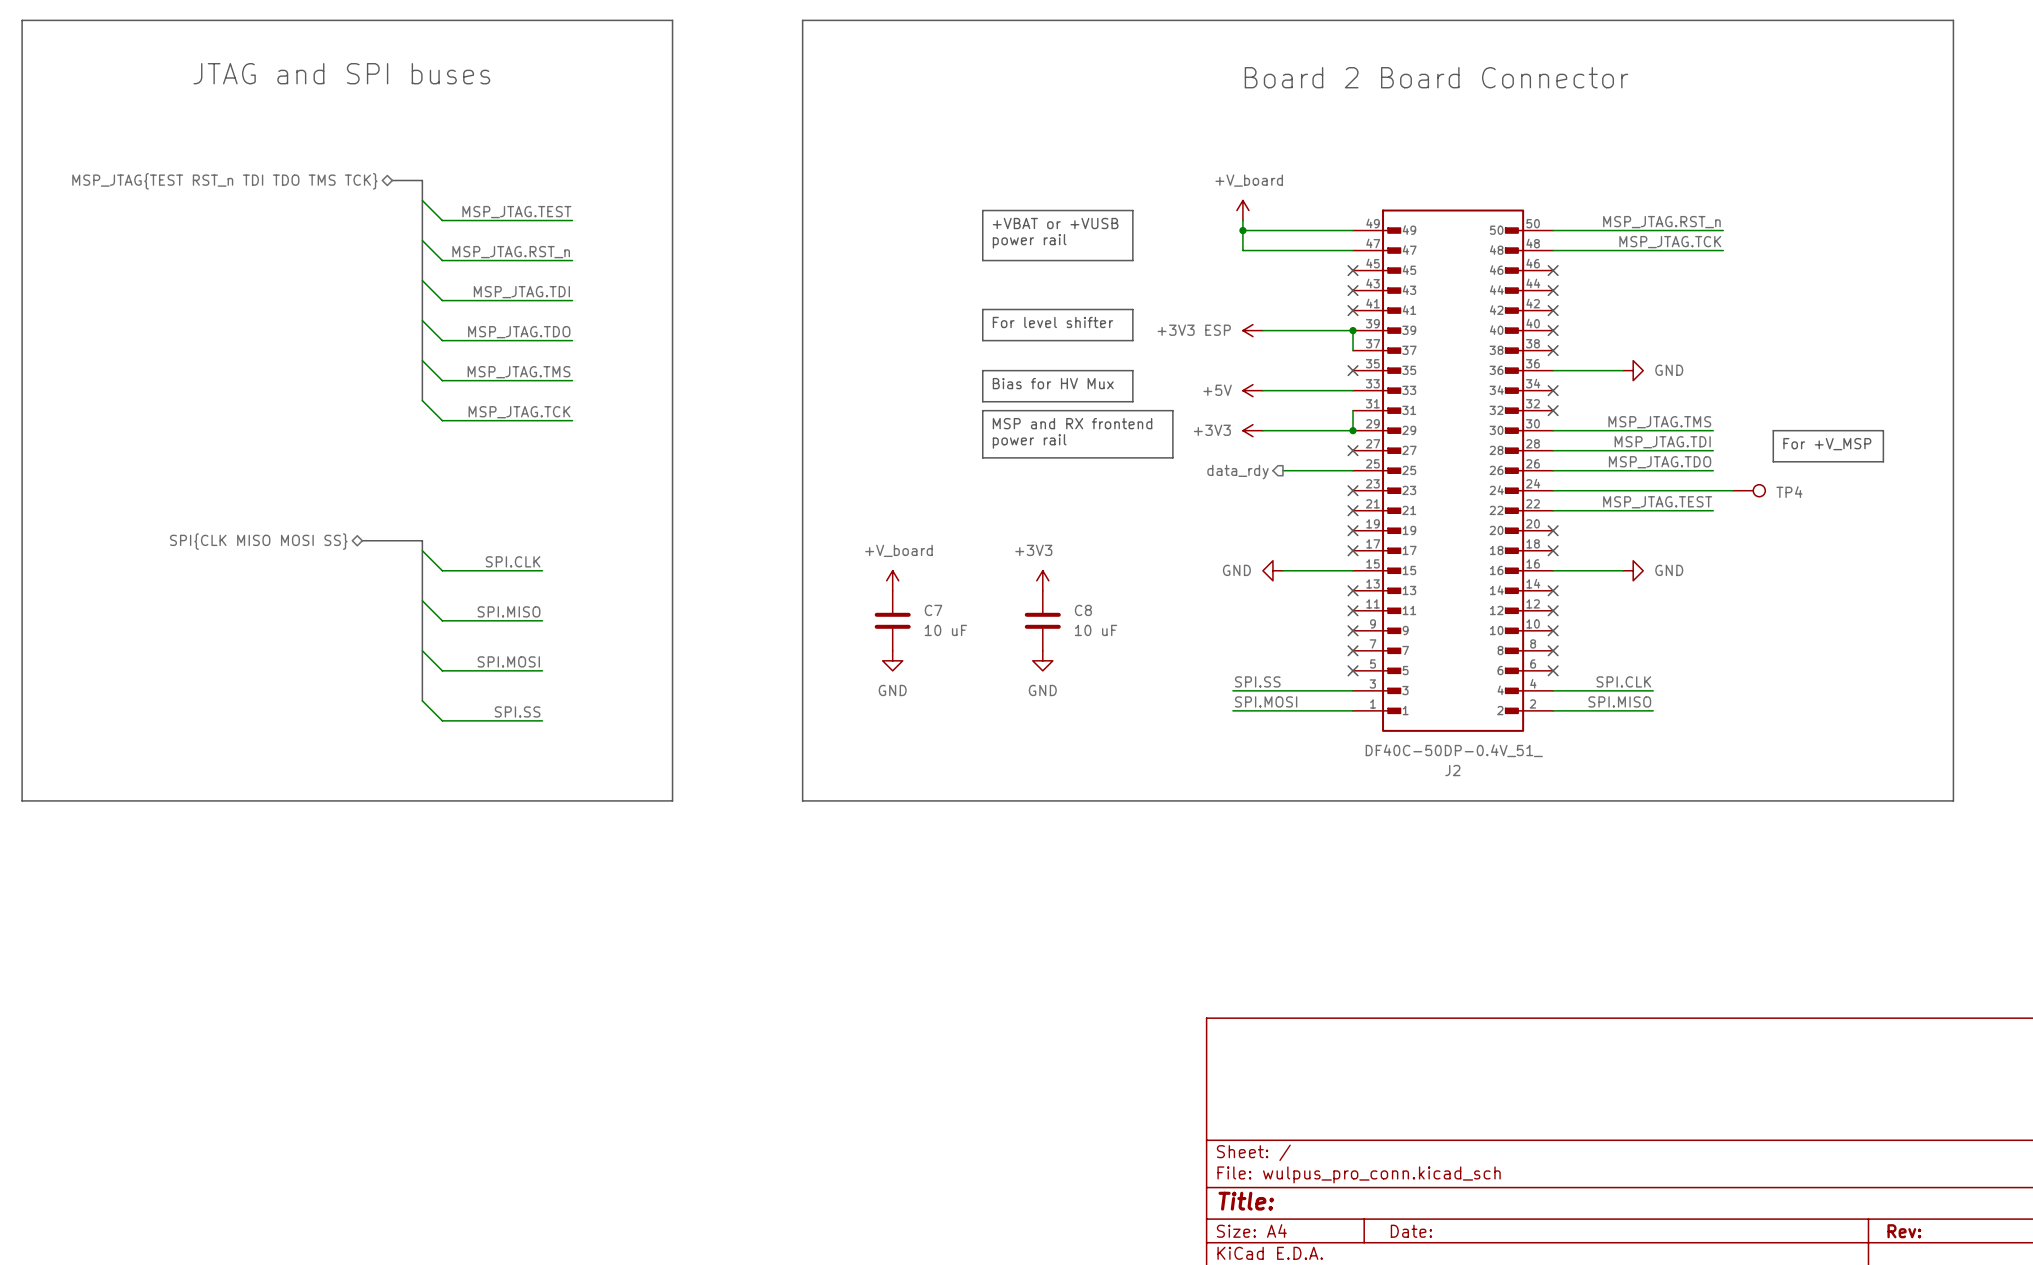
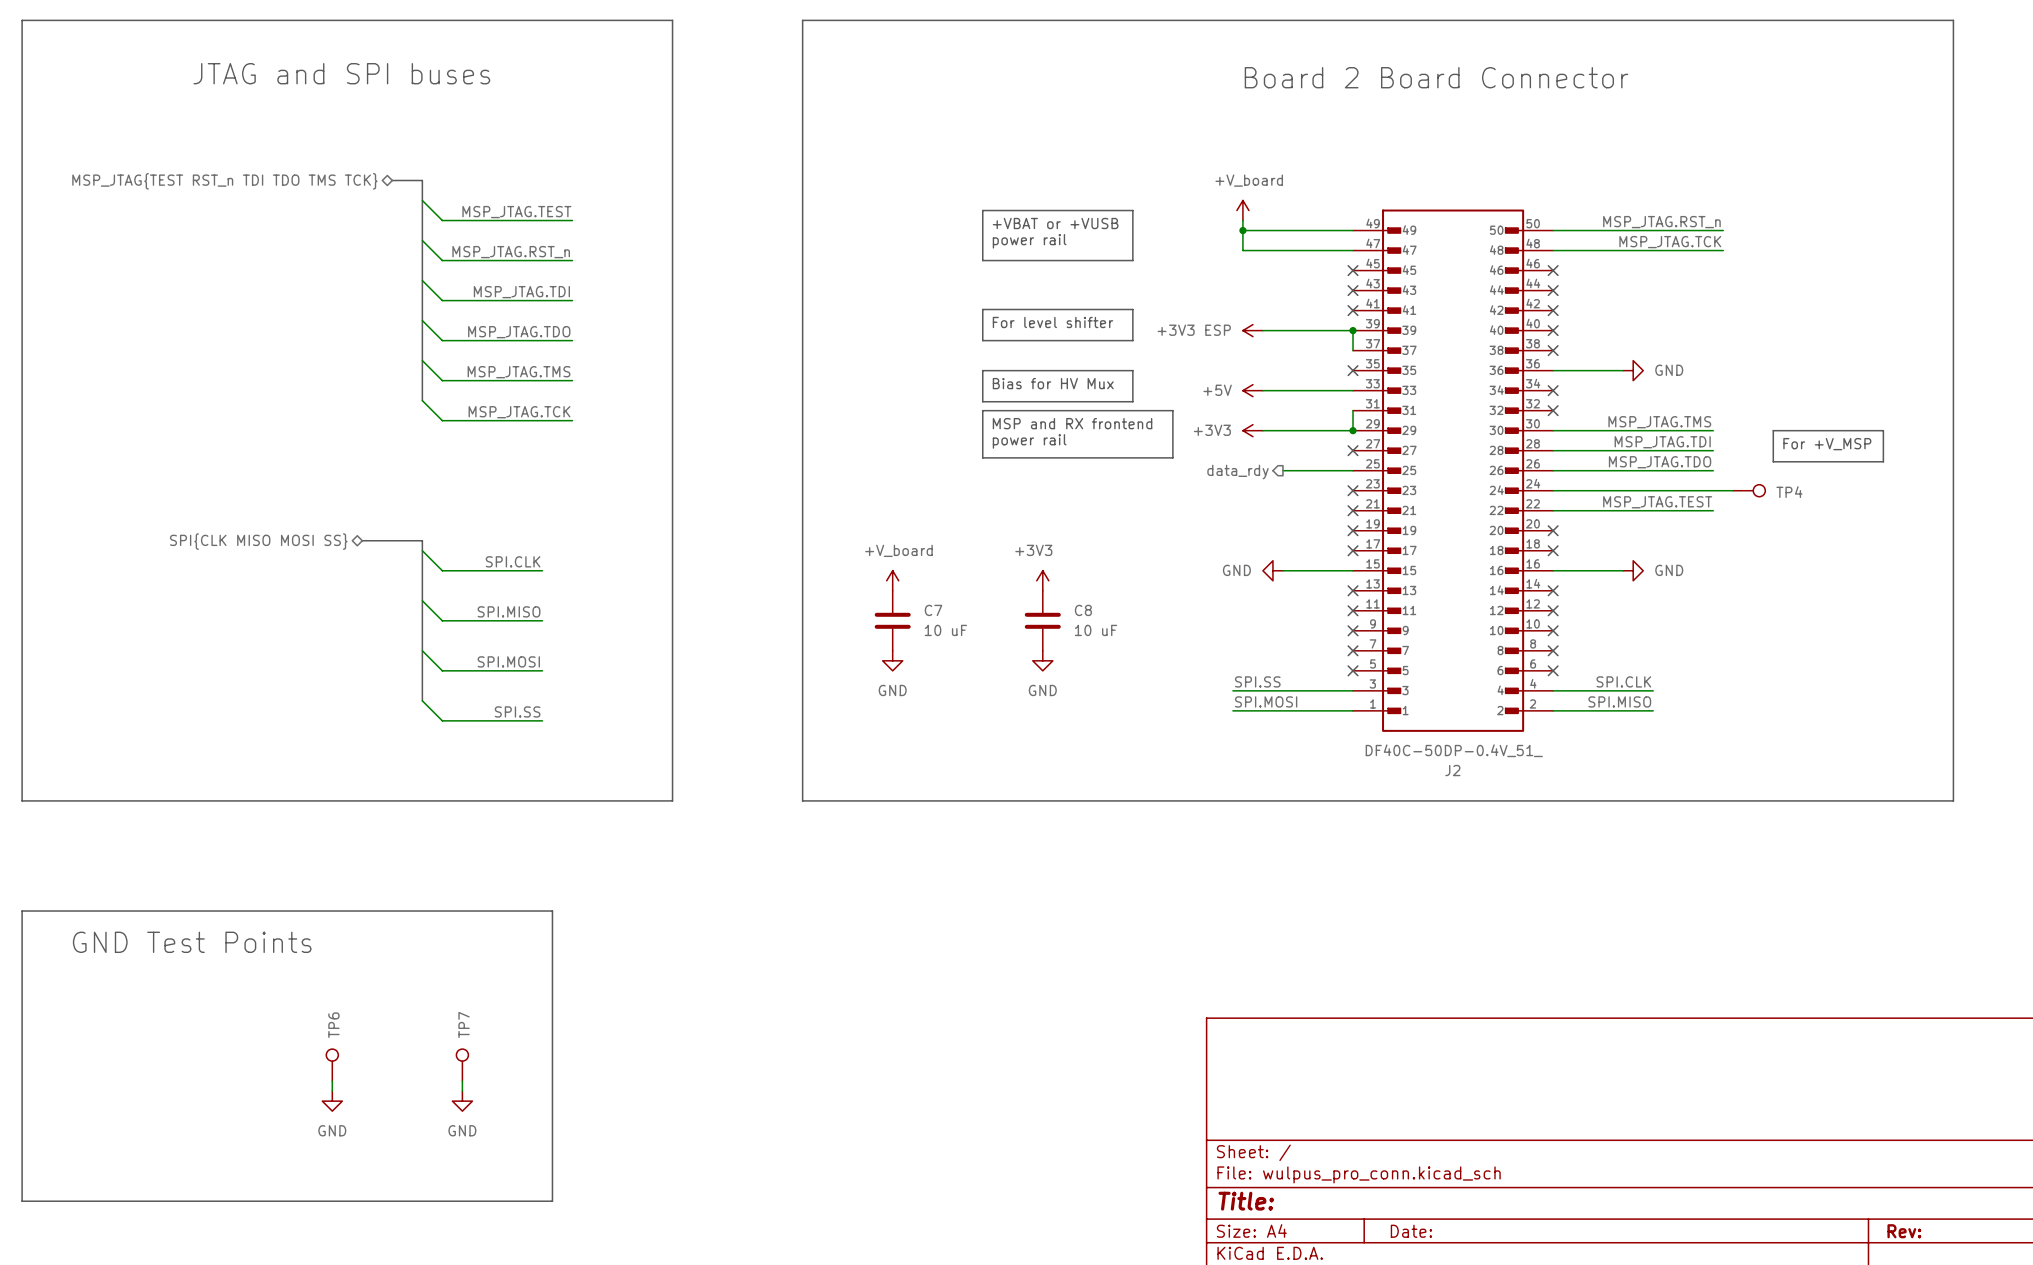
line: none -> (22, 911) (552, 911) (552, 1201) (22, 1201) (22, 911)
text: none -> GND Test Points (192, 942)
TP6: none -> (332, 1065)
TP7: none -> (462, 1065)
wire: none -> (332, 1081) (332, 1091)
wire: none -> (462, 1081) (462, 1091)
power symbol: none -> GND (332, 1101)
power symbol: none -> GND (462, 1101)

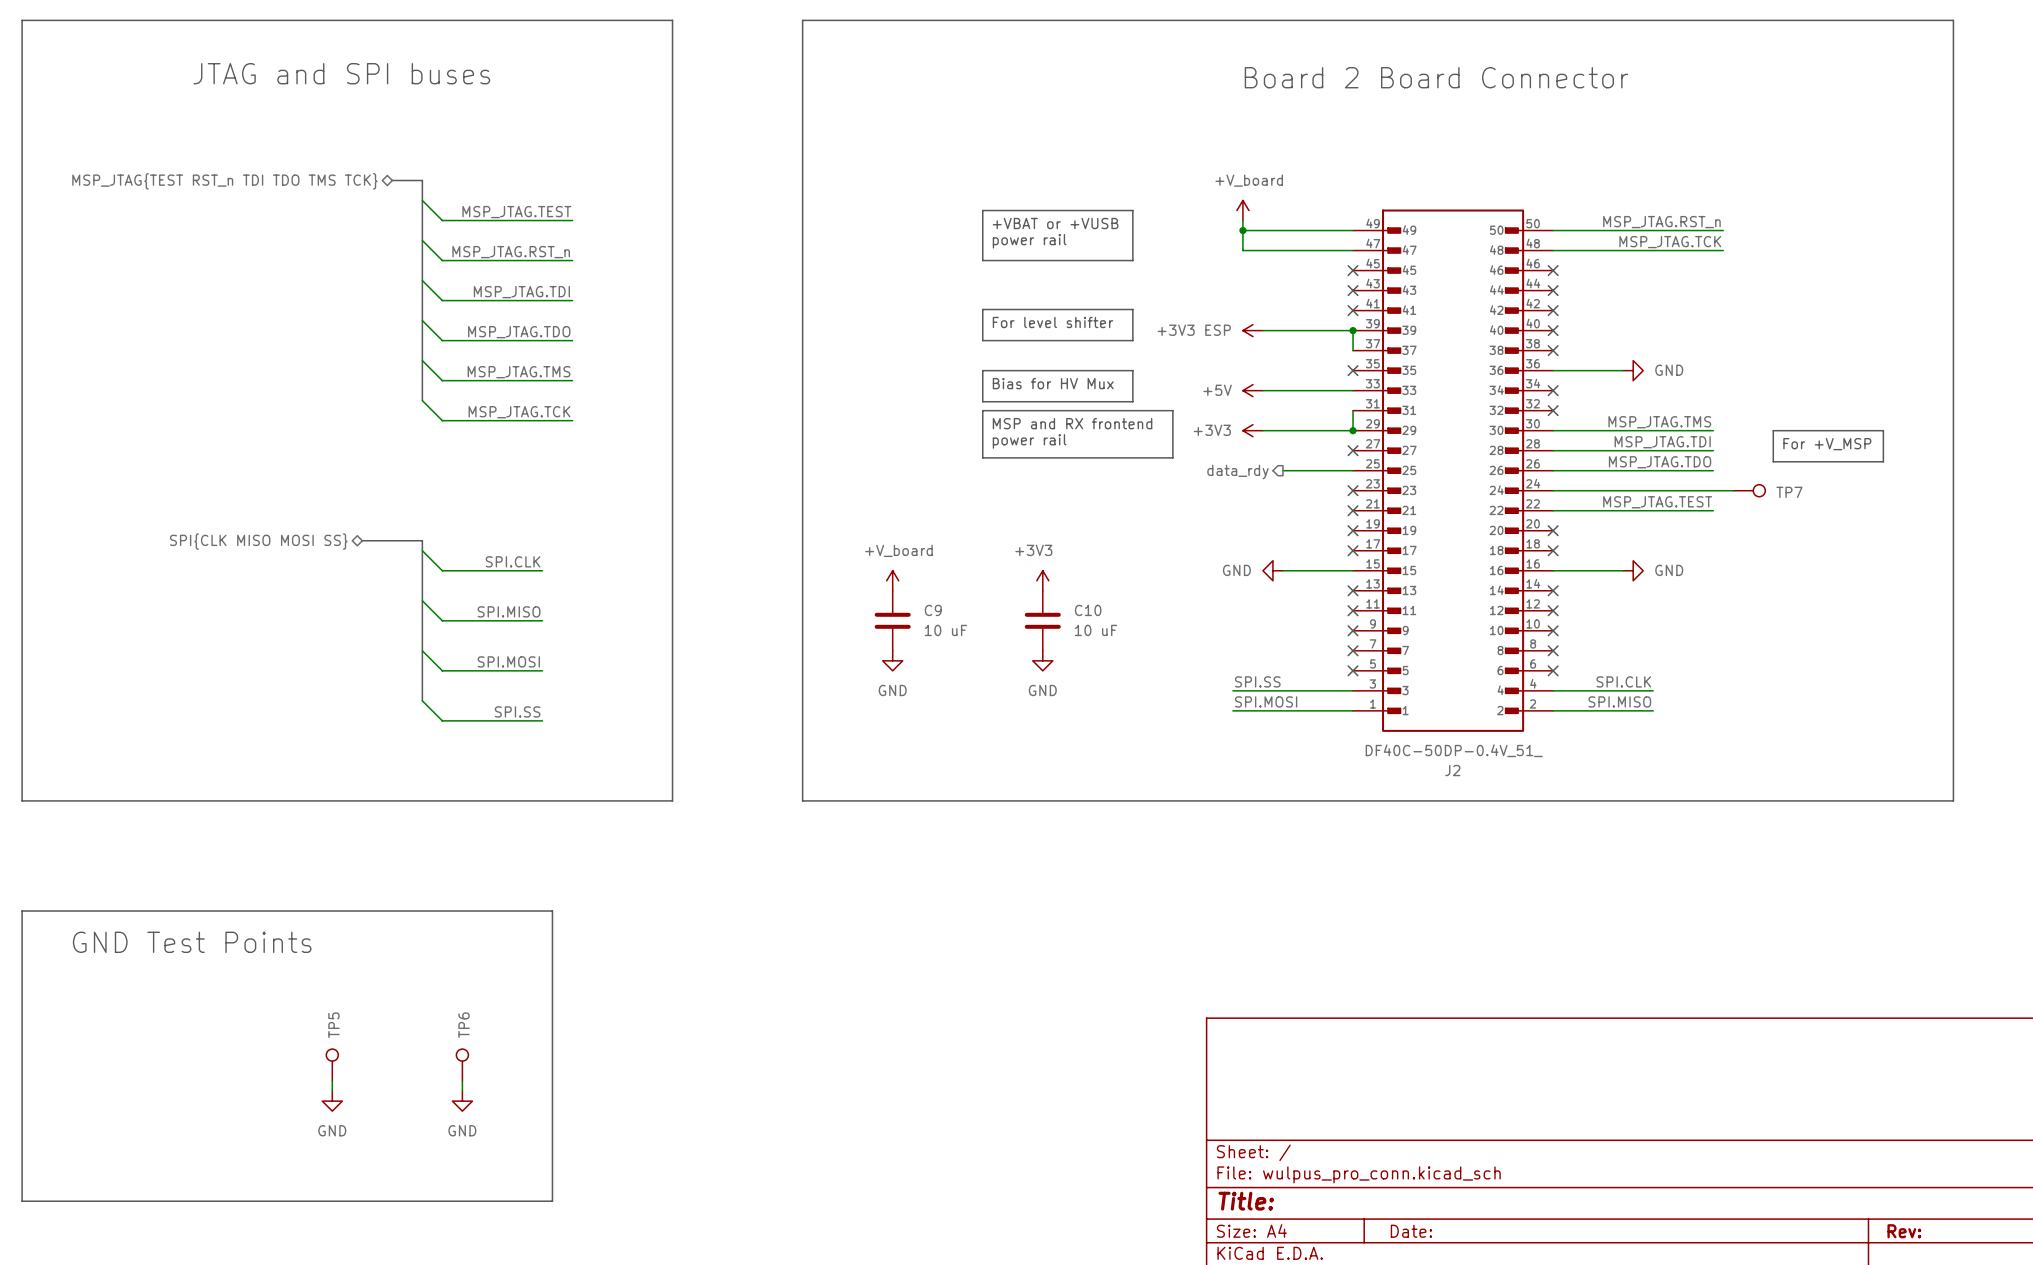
TP4 name: TP4 (1789, 492) -> TP7 (1789, 492)
C7 name: C7 (933, 610) -> C9 (933, 610)
C8 name: C8 (1083, 610) -> C10 (1088, 610)
TP7 name: TP7 (464, 1024) -> TP6 (464, 1025)
TP6 name: TP6 (333, 1025) -> TP5 (333, 1025)

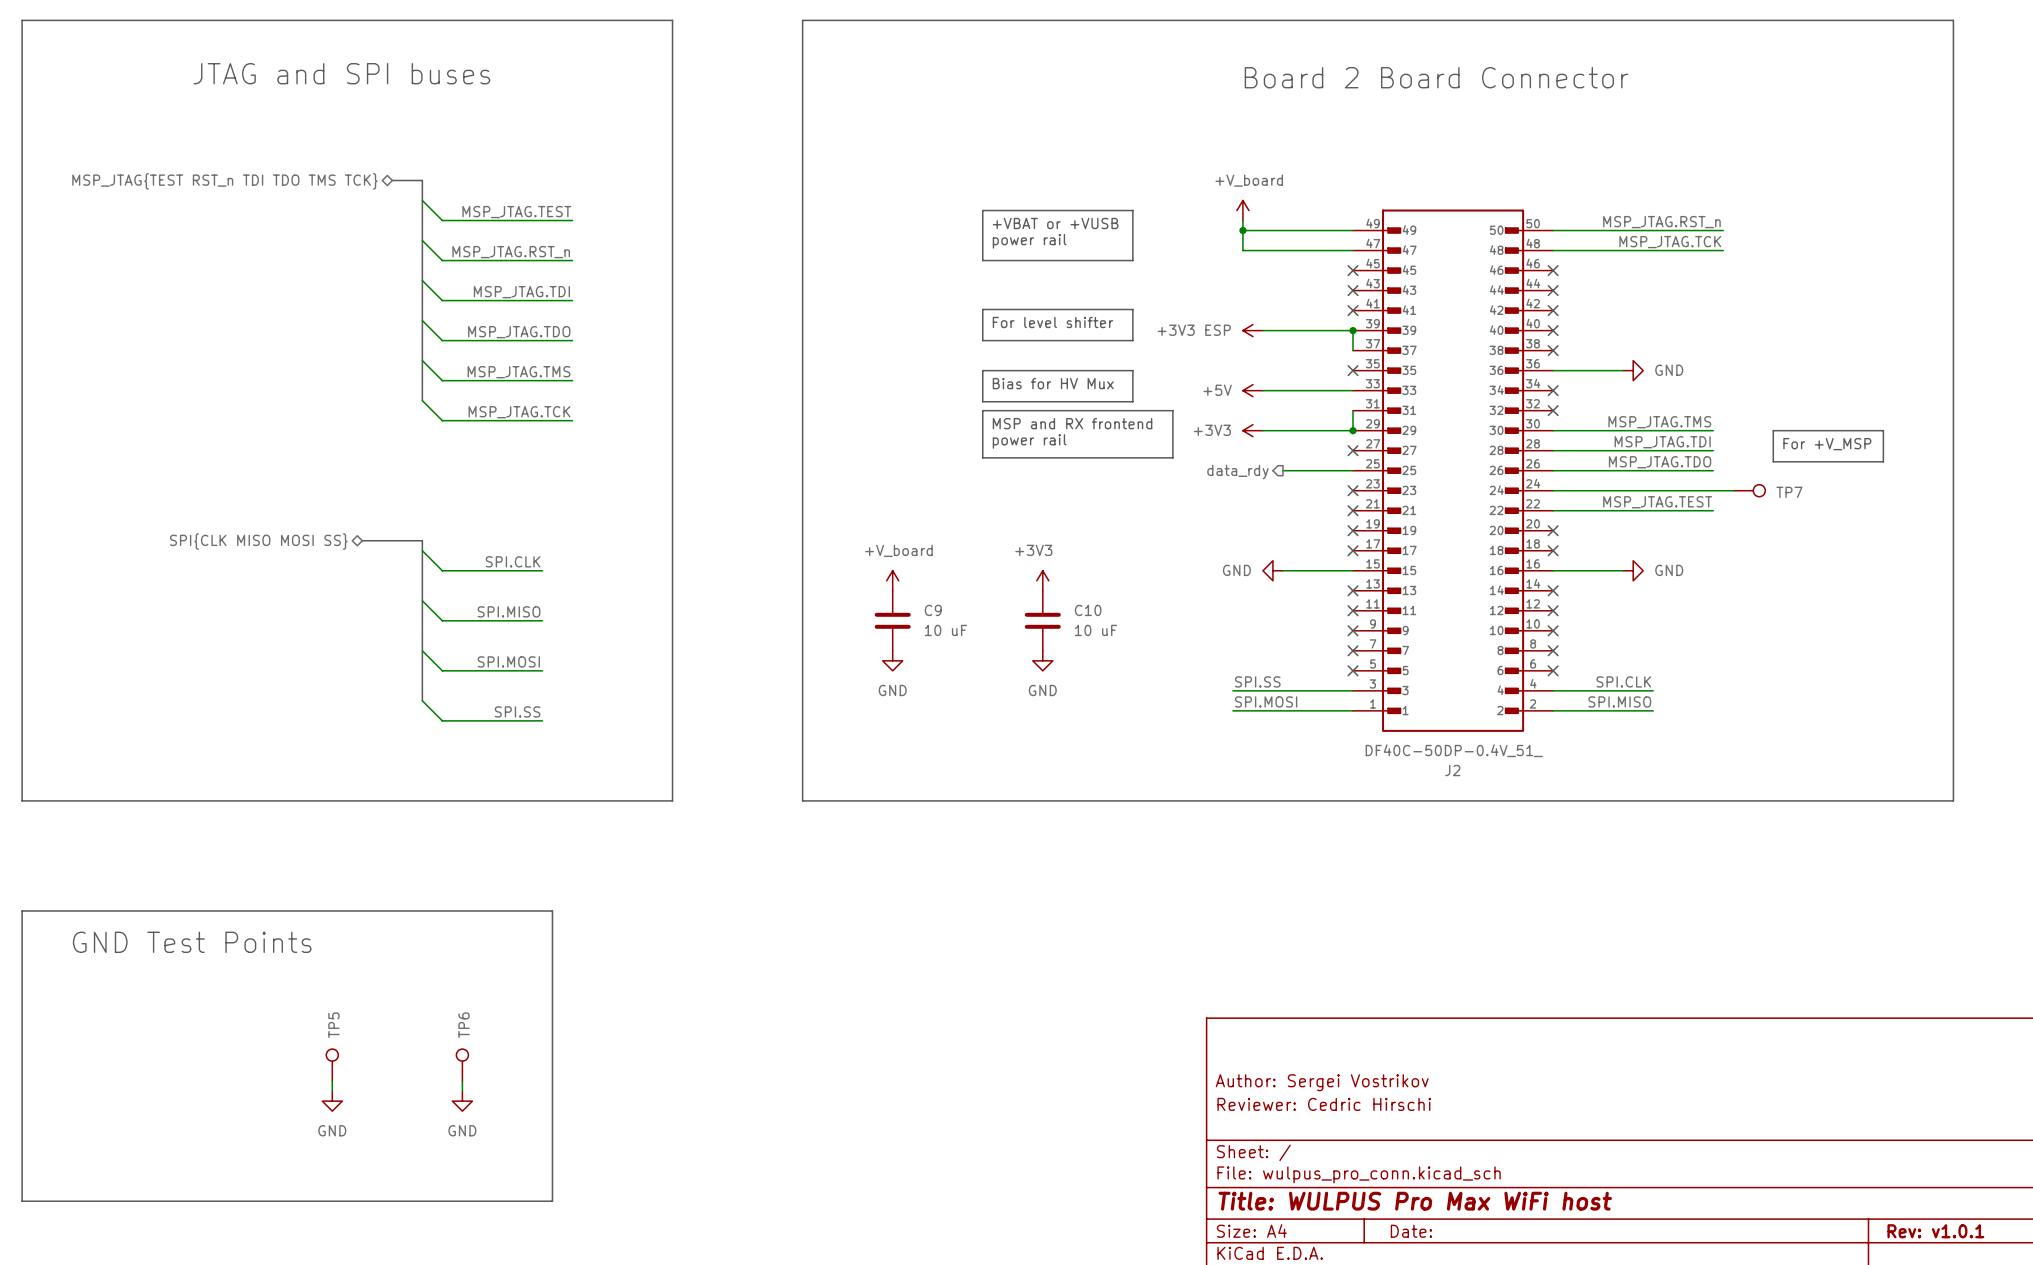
title block: none -> Author: Sergei Vostrikov (1322, 1082)
title block: none -> Reviewer: Cedric Hirschi (1324, 1104)
title block: Title: (1246, 1201) -> Title: WULPUS Pro Max WiFi host (1415, 1201)
title block: Rev: (1904, 1231) -> Rev: v1.0.1 (1935, 1231)

